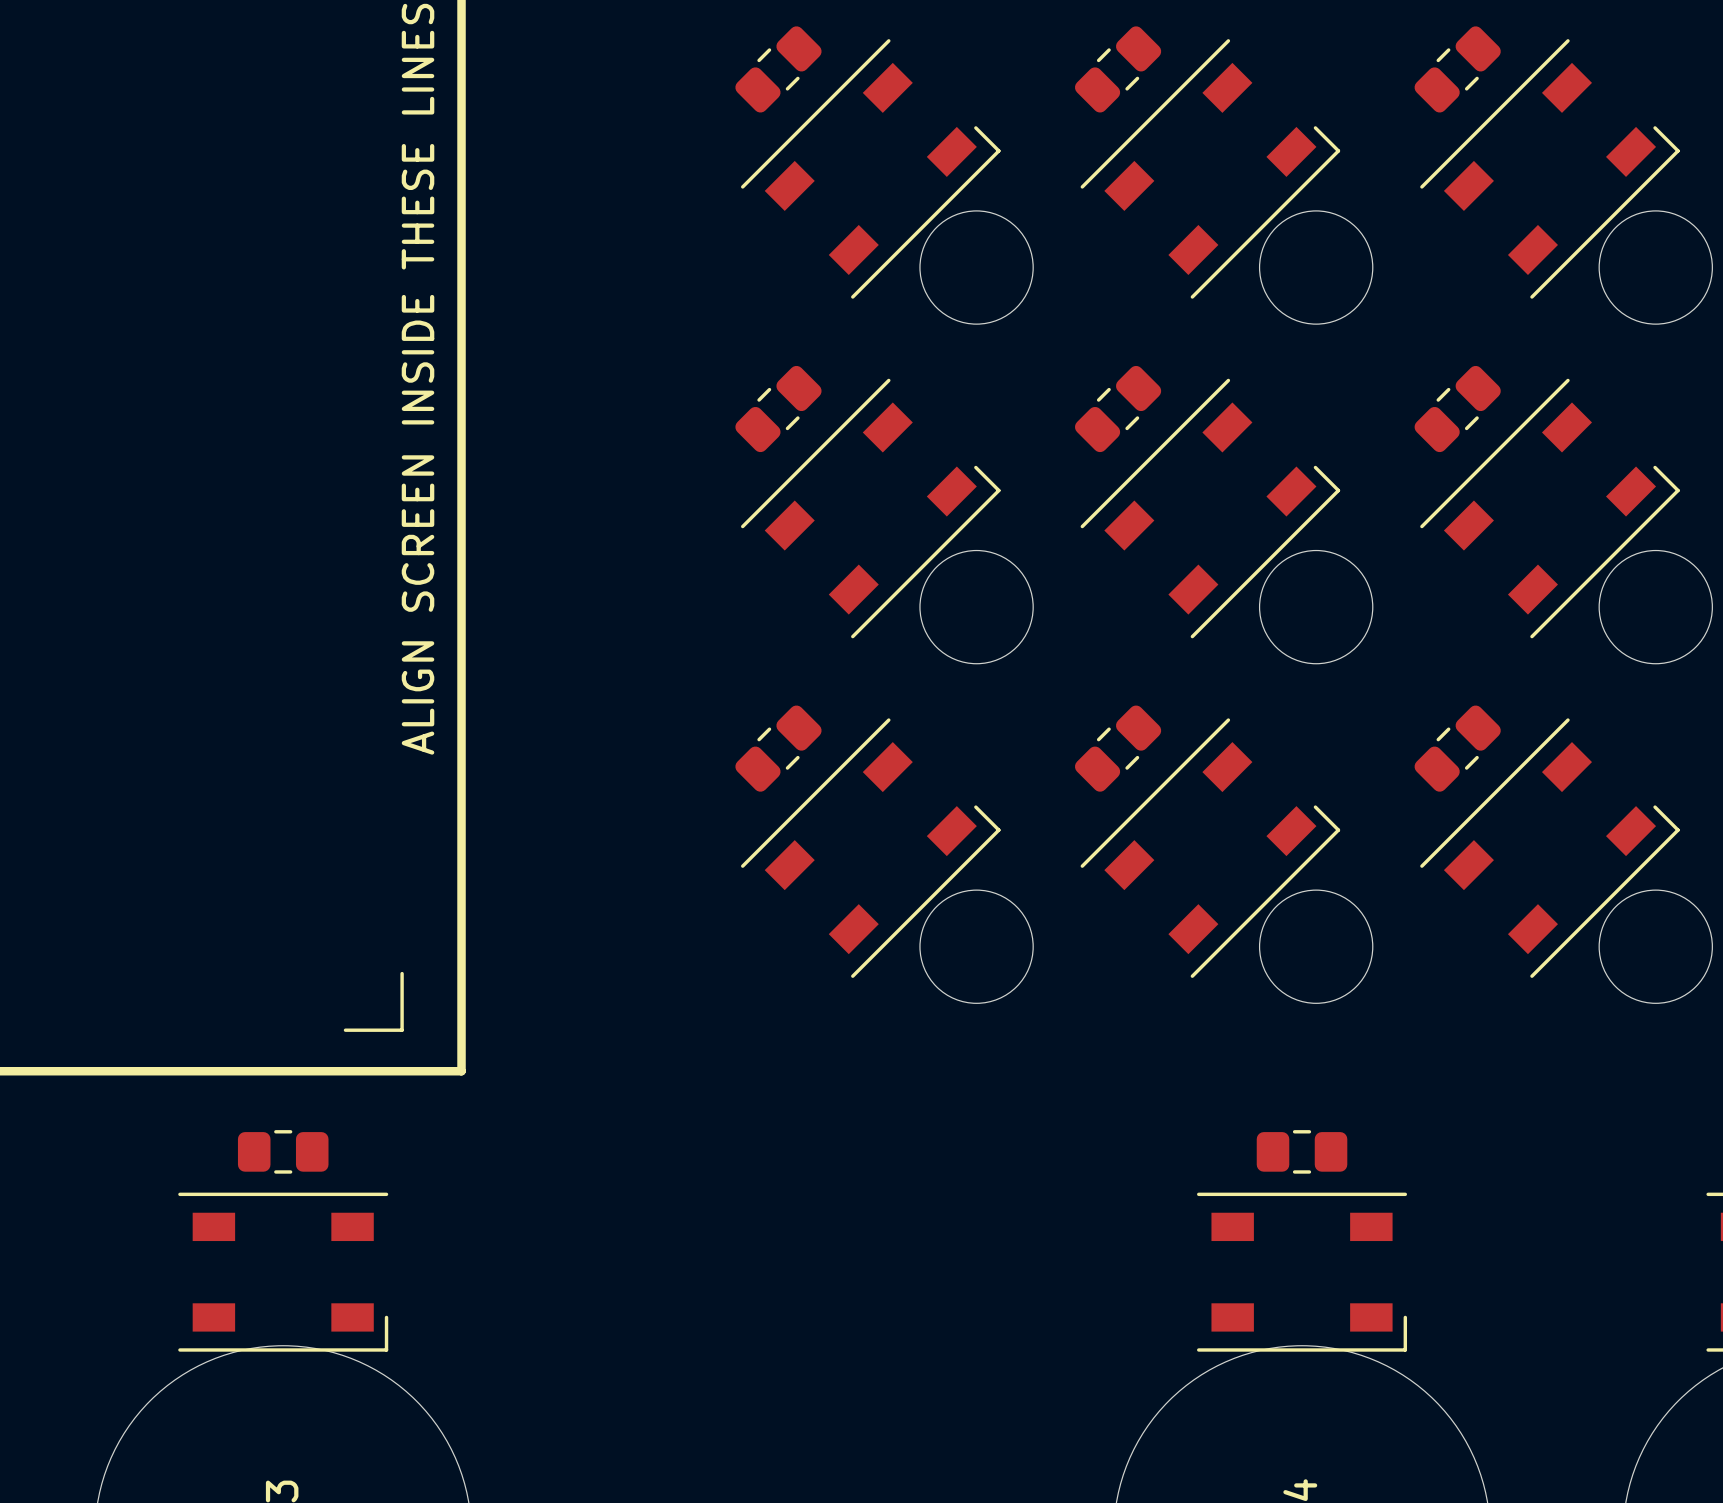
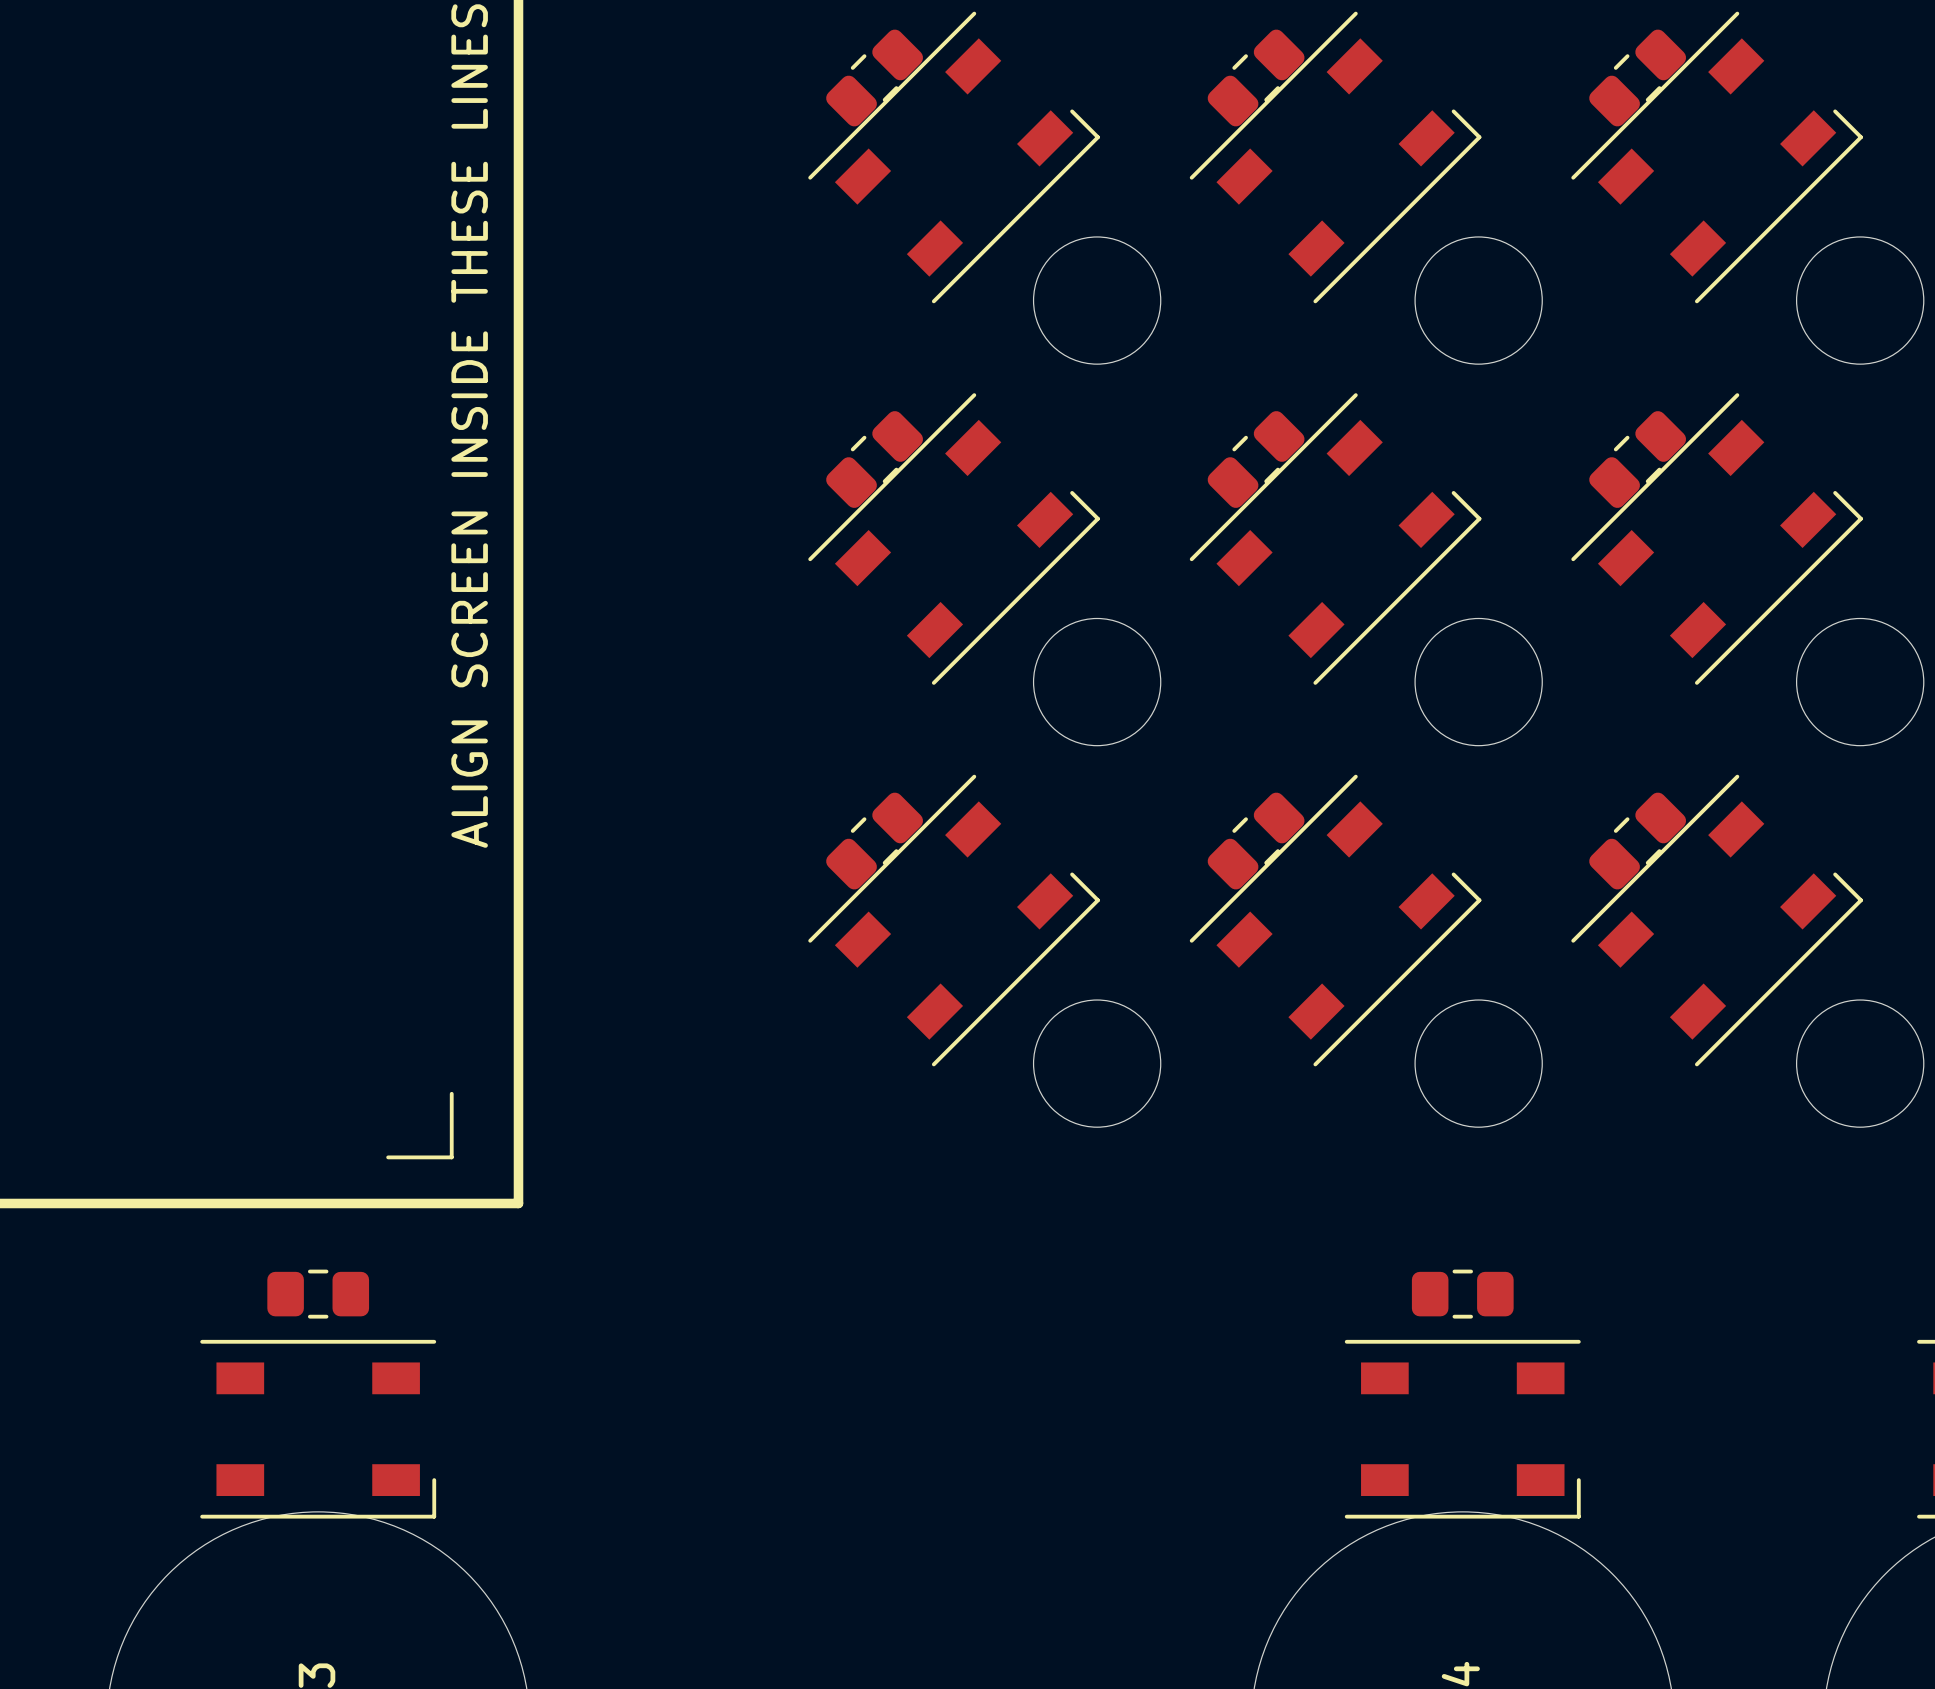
part position: (870, 168) -> (954, 157)
part position: (1210, 168) -> (1335, 157)
part position: (1549, 168) -> (1717, 157)
part position: (870, 508) -> (954, 539)
part position: (1210, 508) -> (1335, 539)
part position: (1549, 508) -> (1717, 539)
part position: (870, 848) -> (954, 920)
part position: (1210, 848) -> (1335, 920)
part position: (1549, 848) -> (1717, 920)

